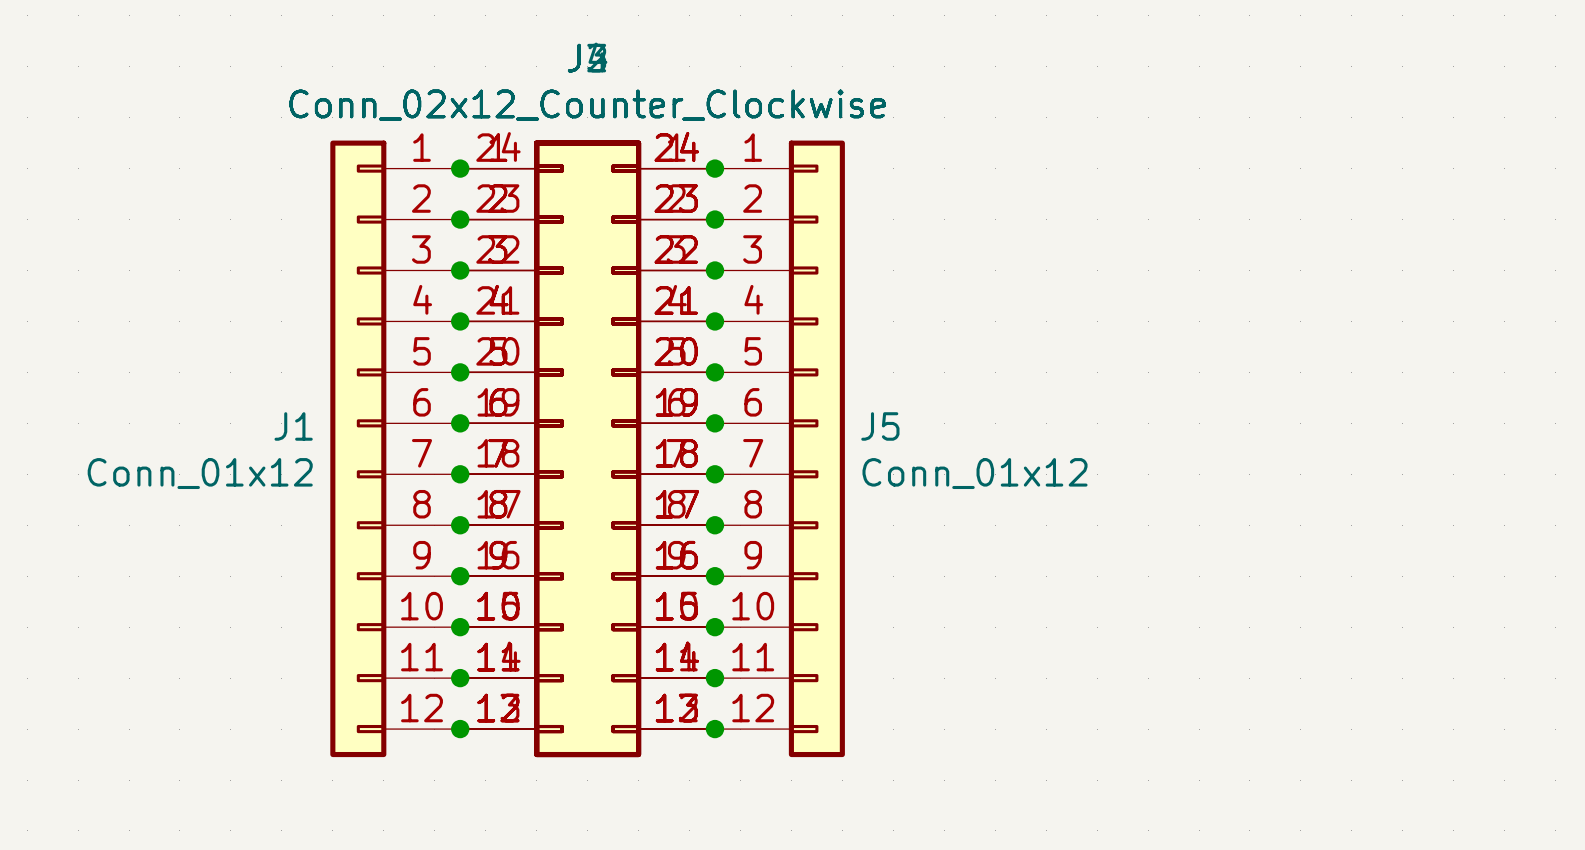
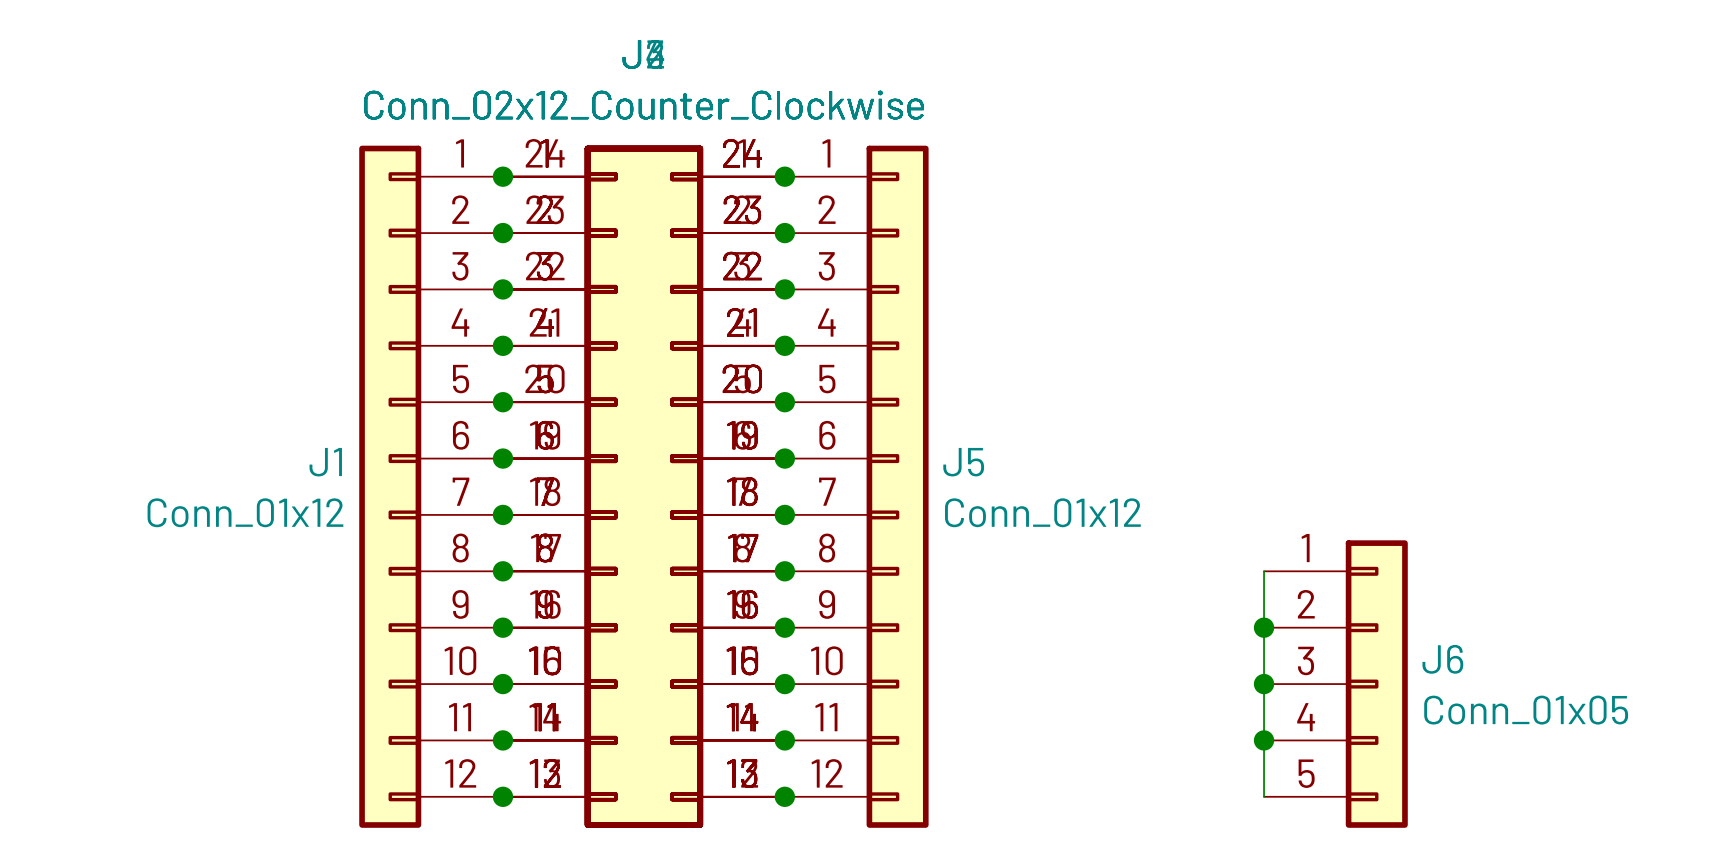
wire: none -> (1264, 571) (1264, 796)
junction: none -> (1264, 627)
junction: none -> (1264, 684)
J6: none -> Conn_01x05 (1335, 684)
junction: none -> (1264, 740)

